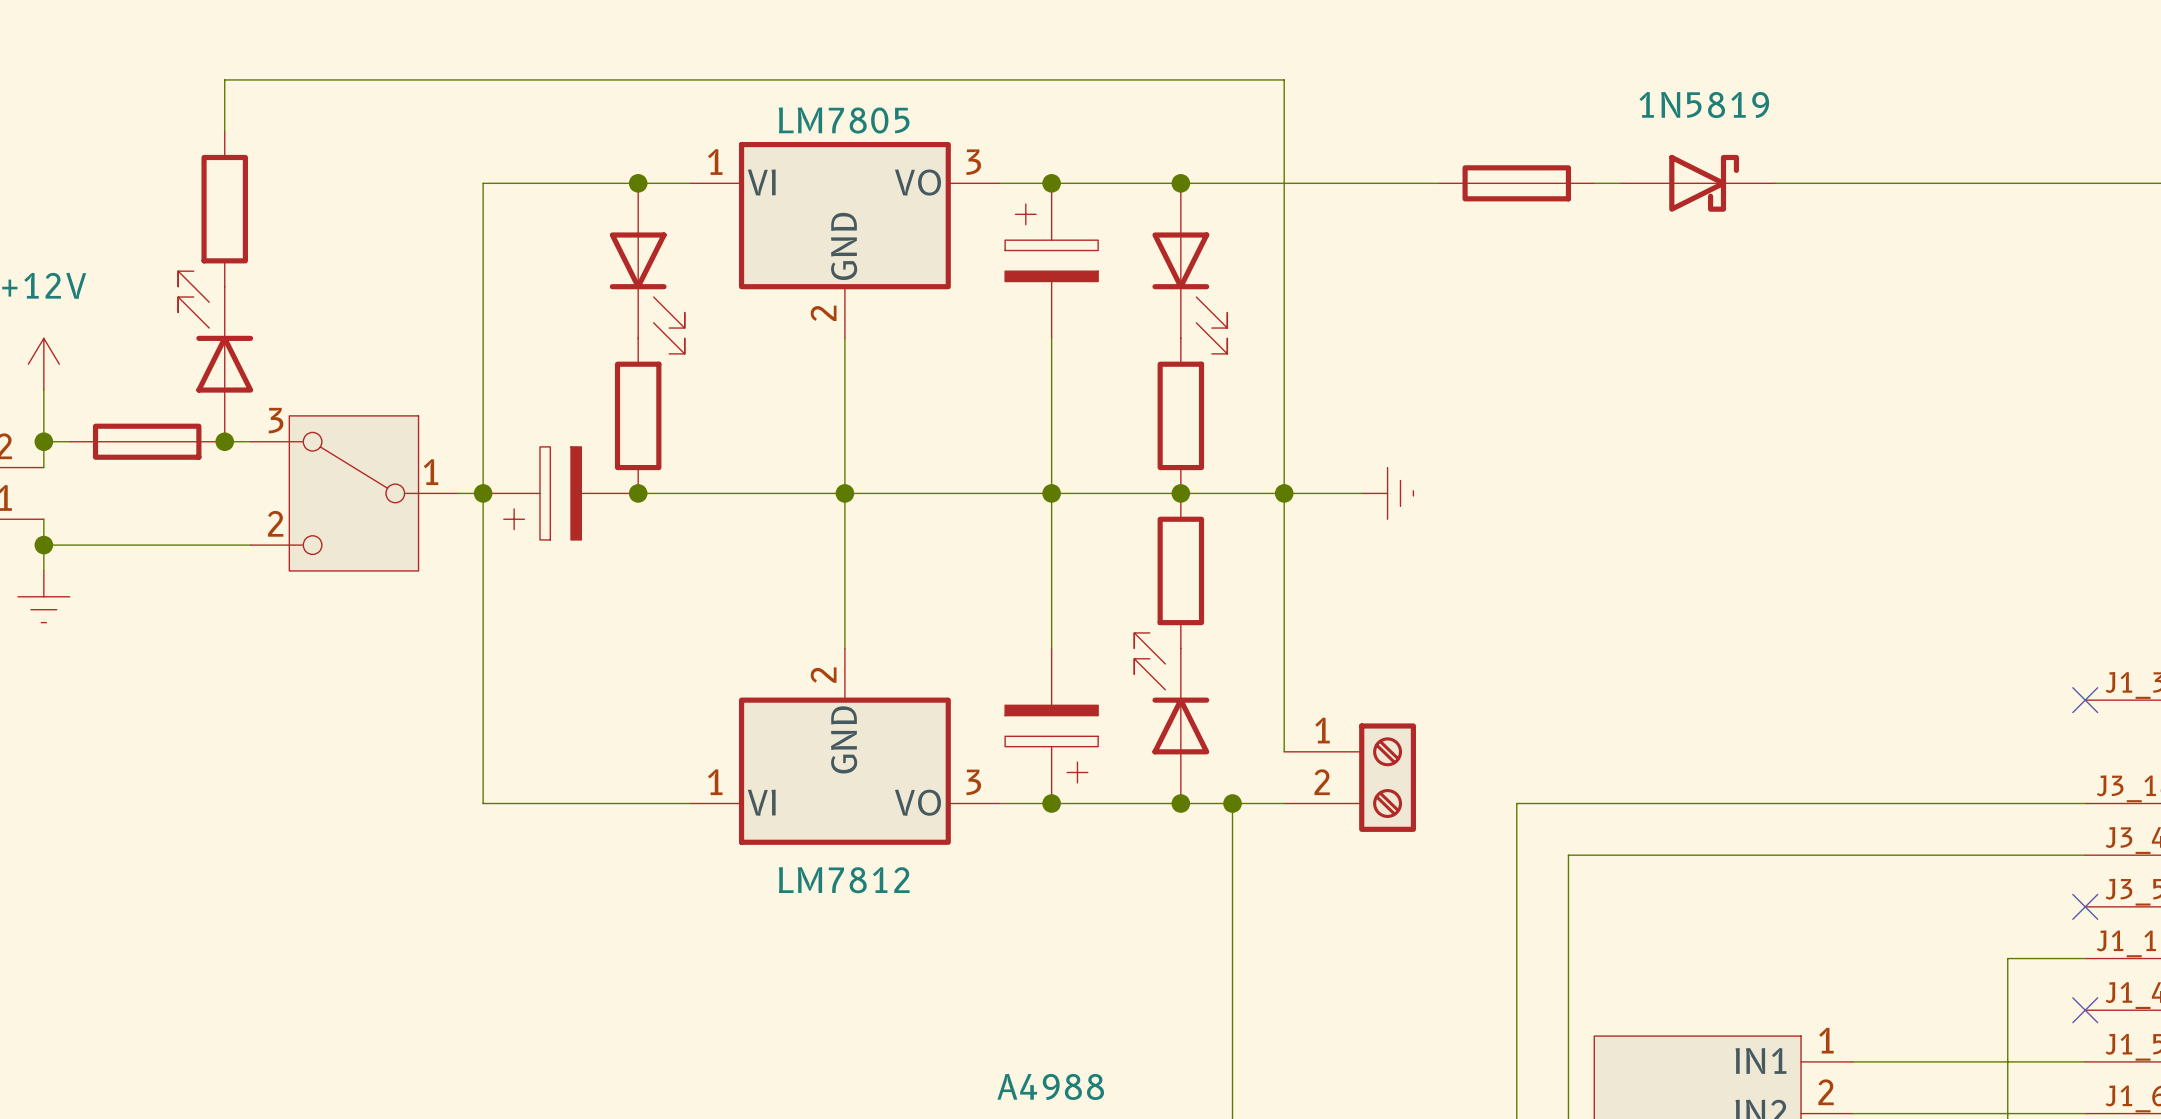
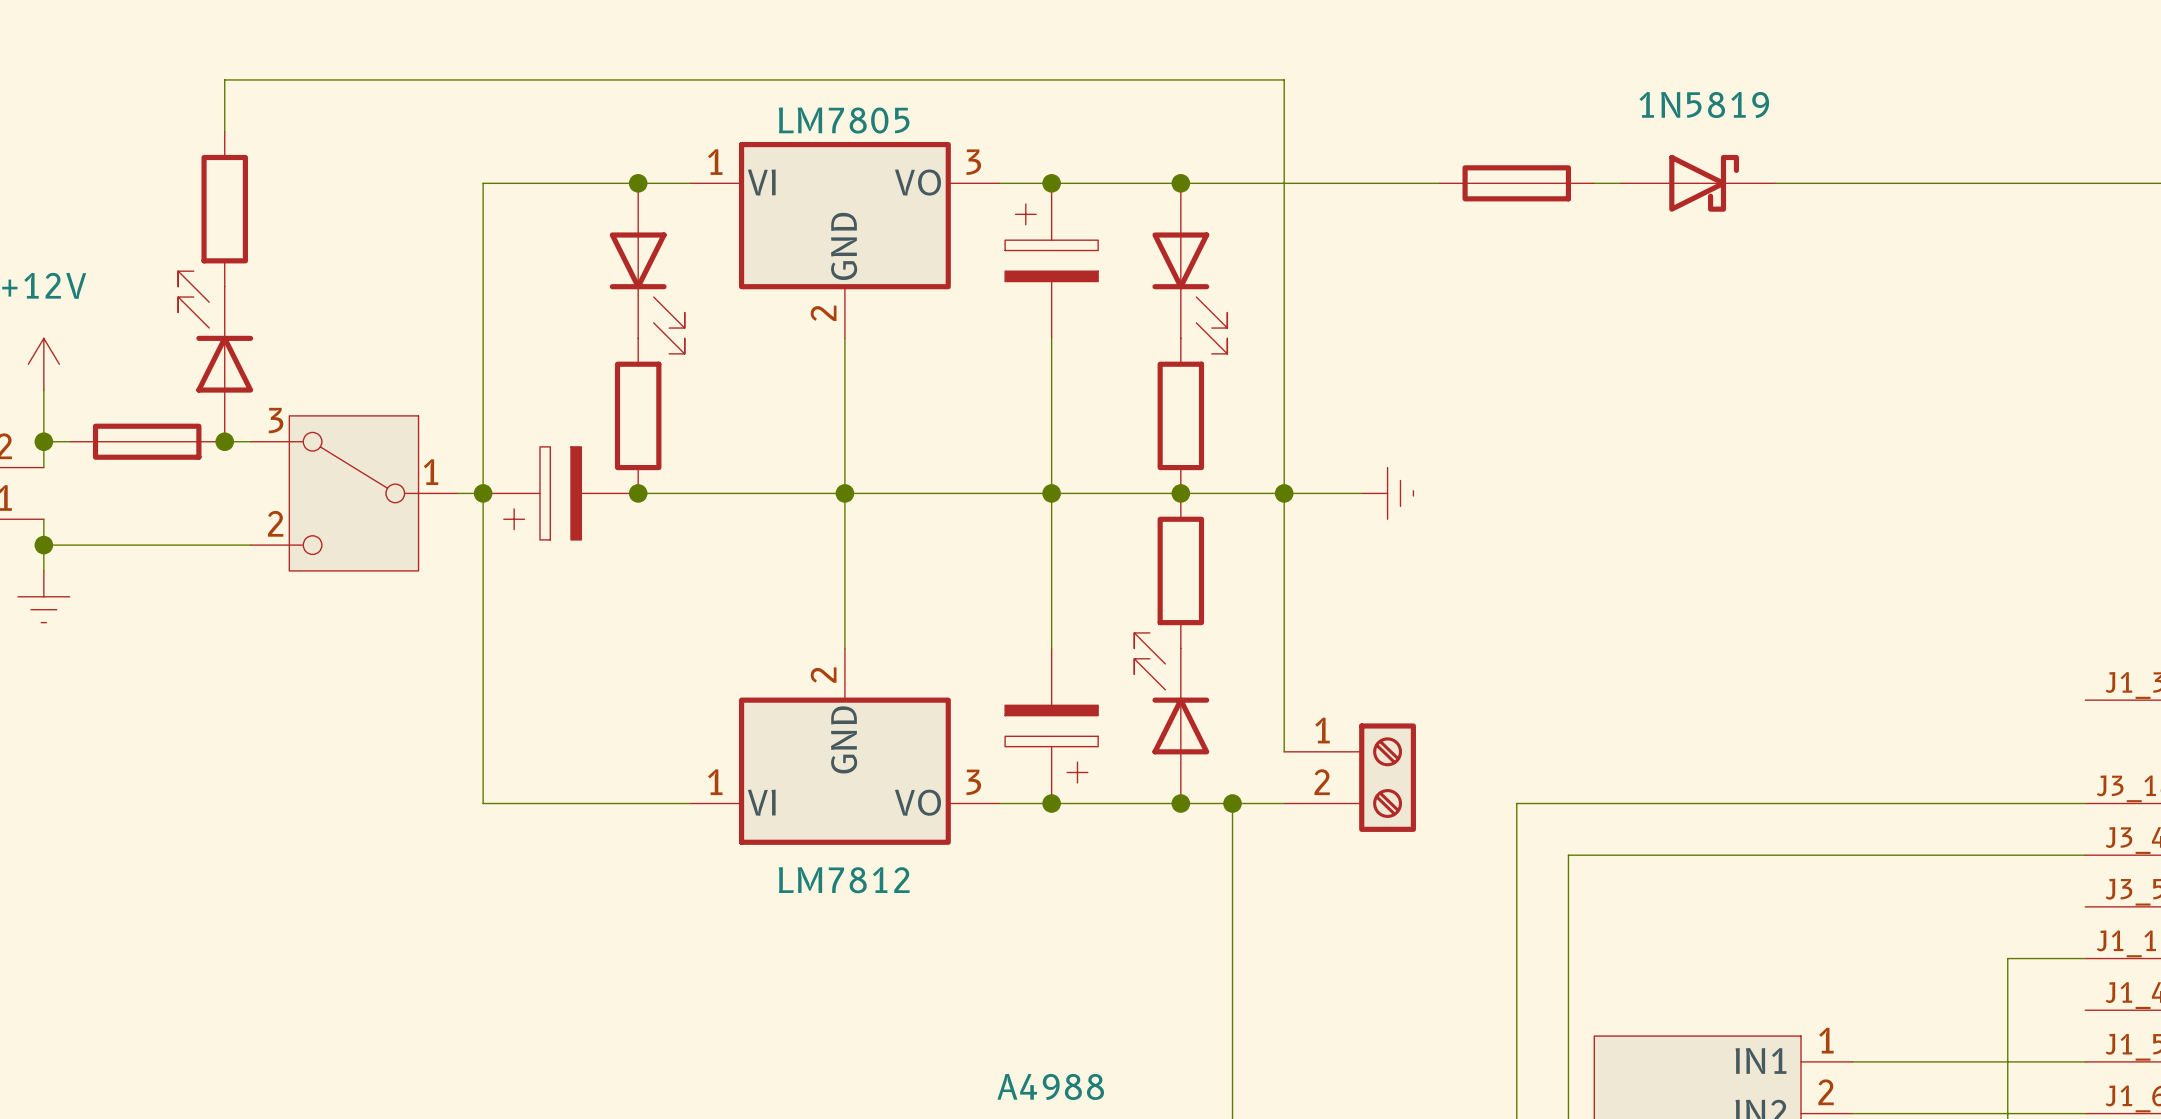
no-connect mark: (2085, 700) -> none
no-connect mark: (2085, 906) -> none
no-connect mark: (2085, 1010) -> none

